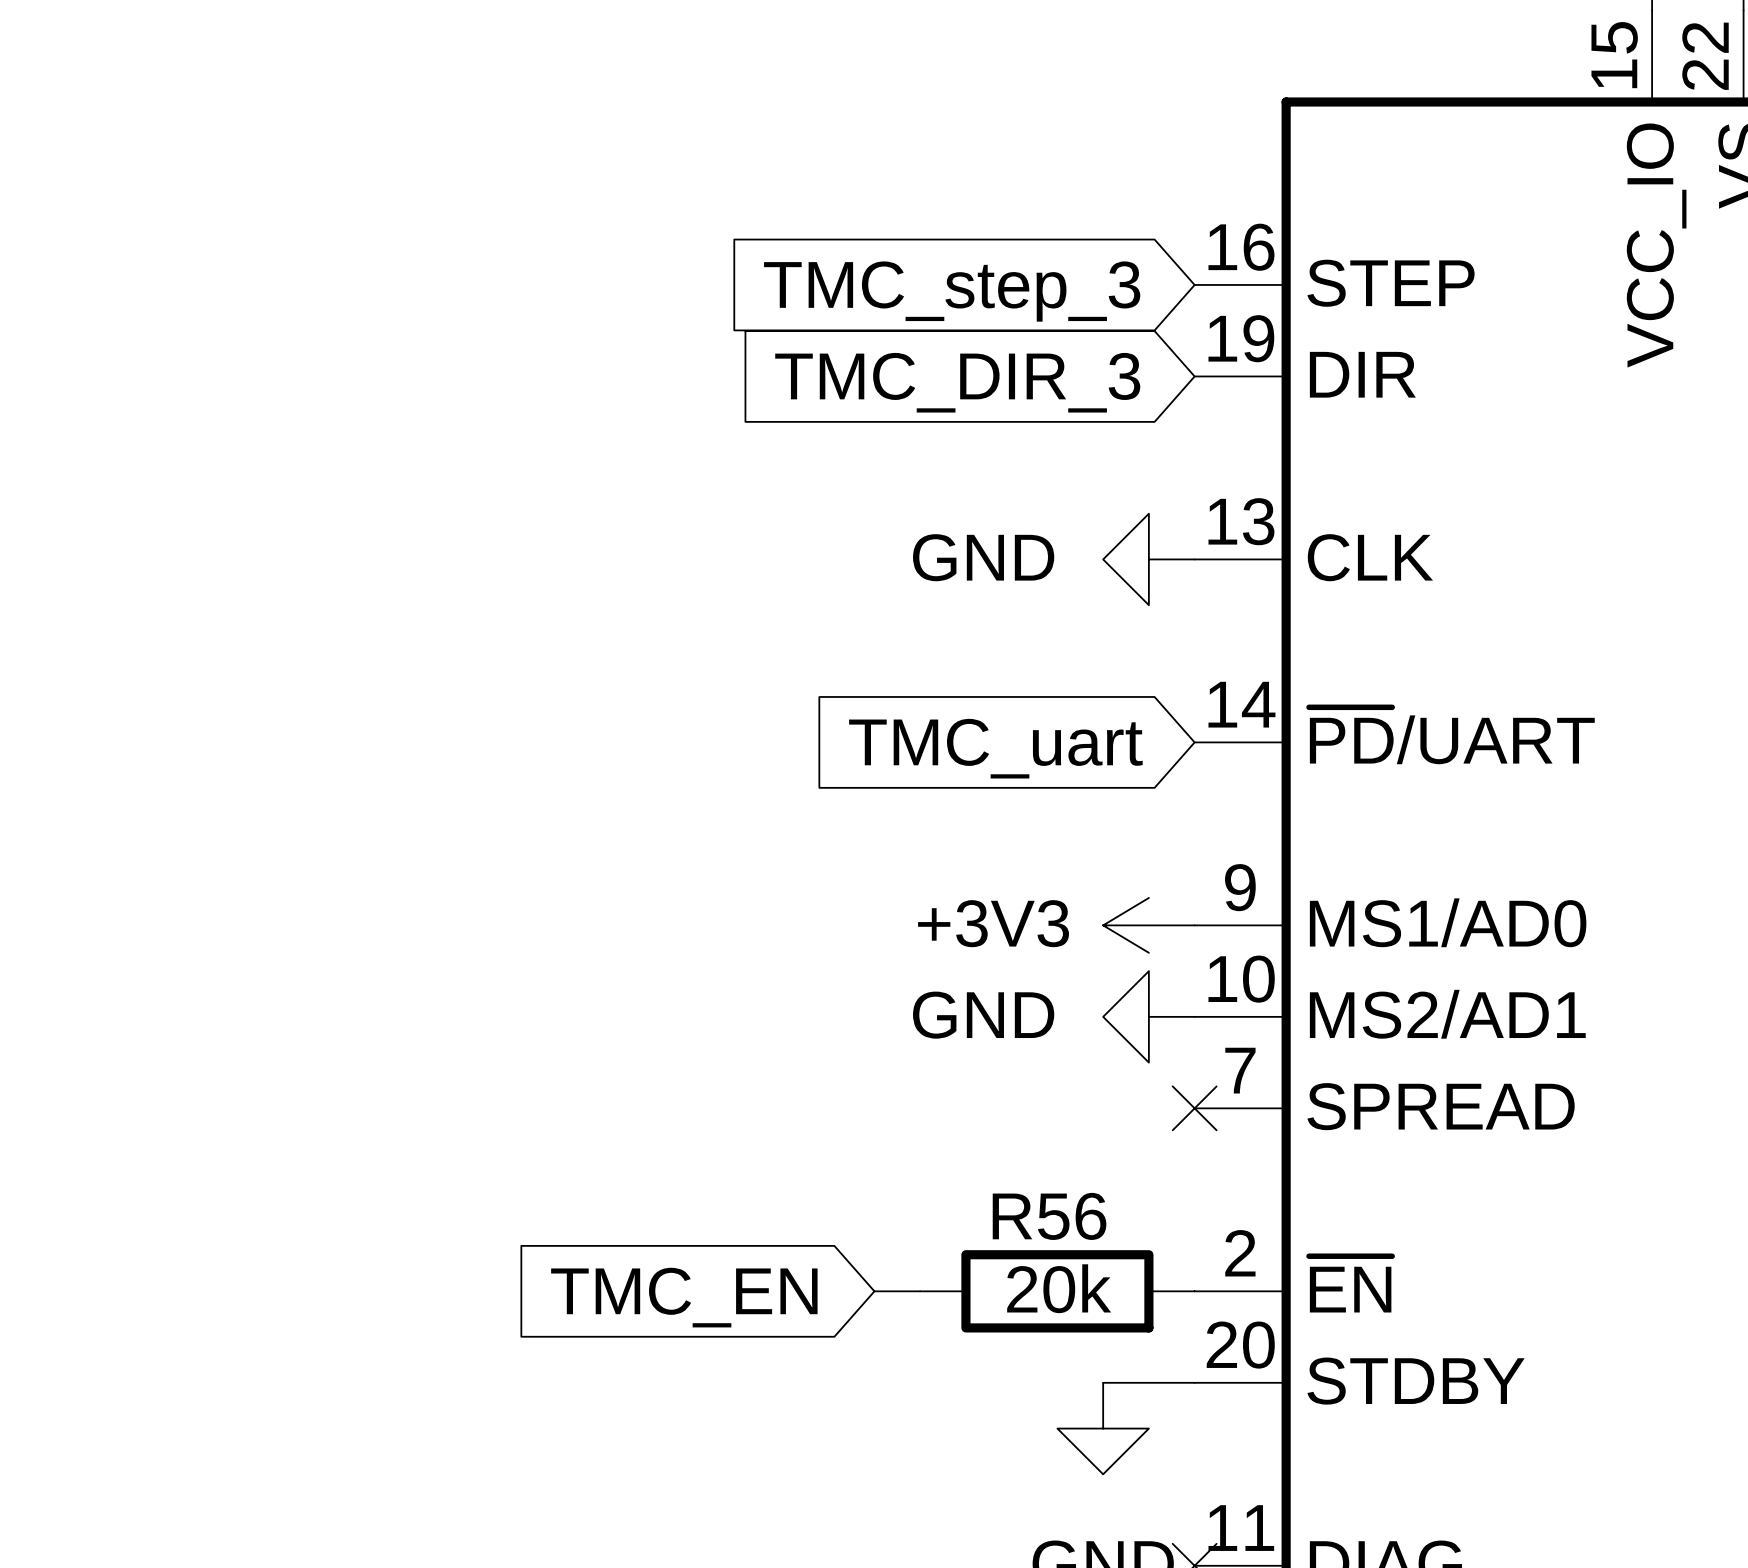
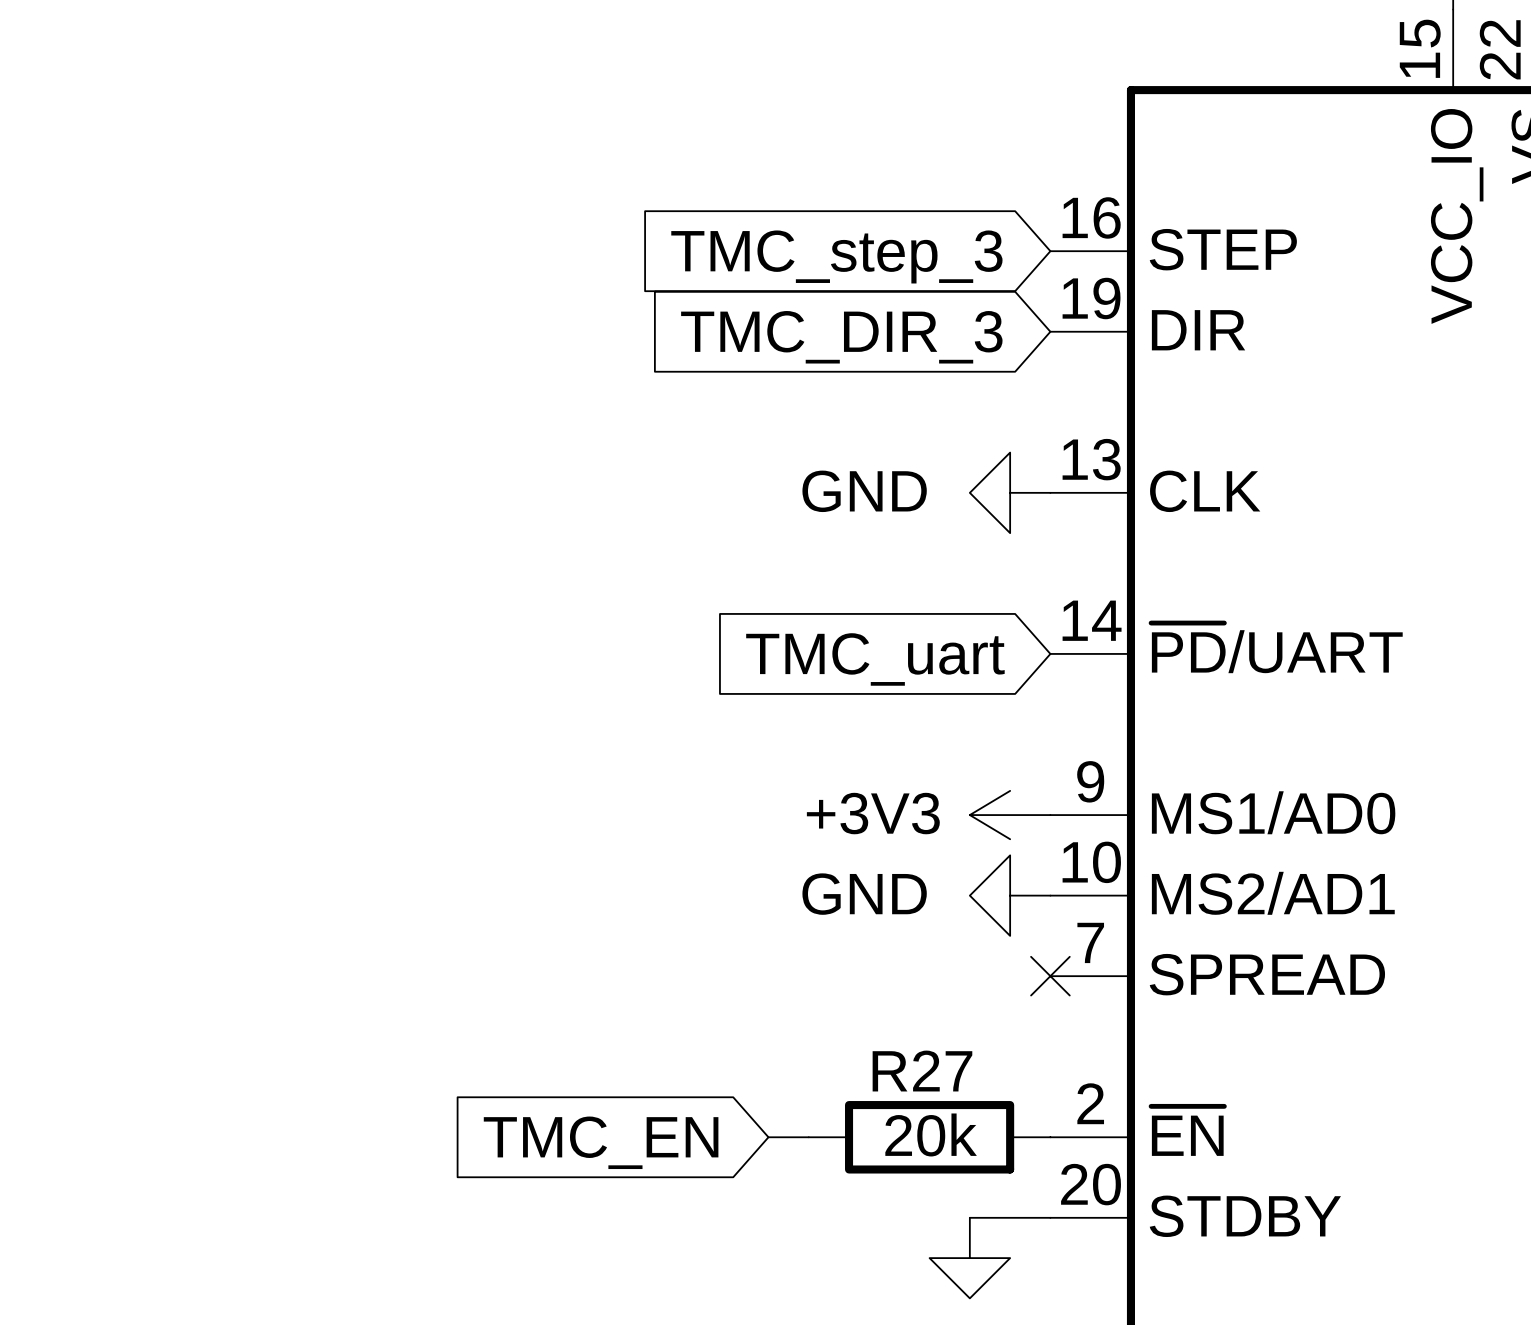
R56 name: R56 (1049, 1216) -> R27 (922, 1071)

